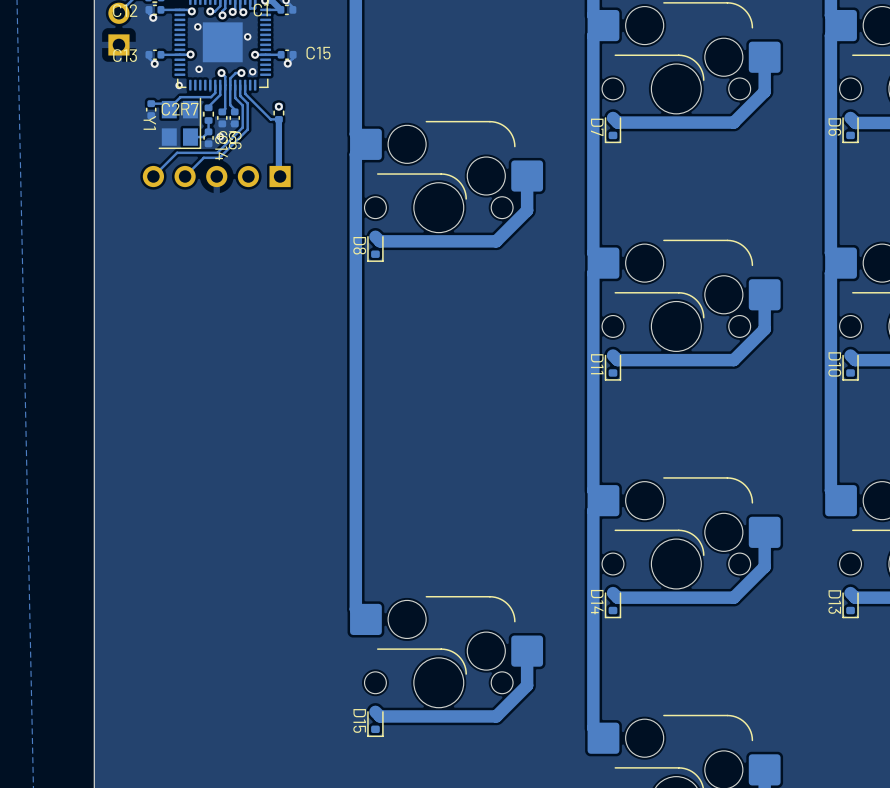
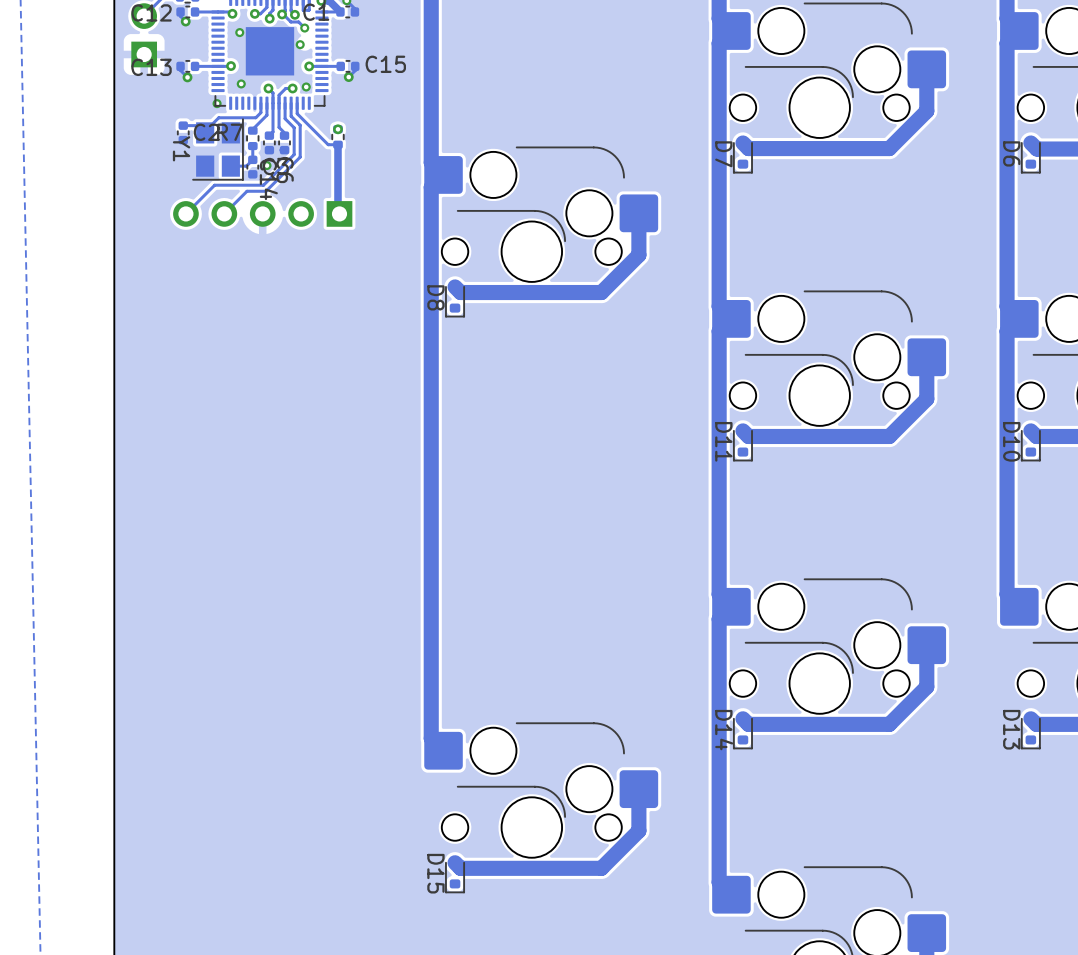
track: none -> (282, 13) (290, 21) (298, 21) (304, 28)
via: none -> (304, 28)

